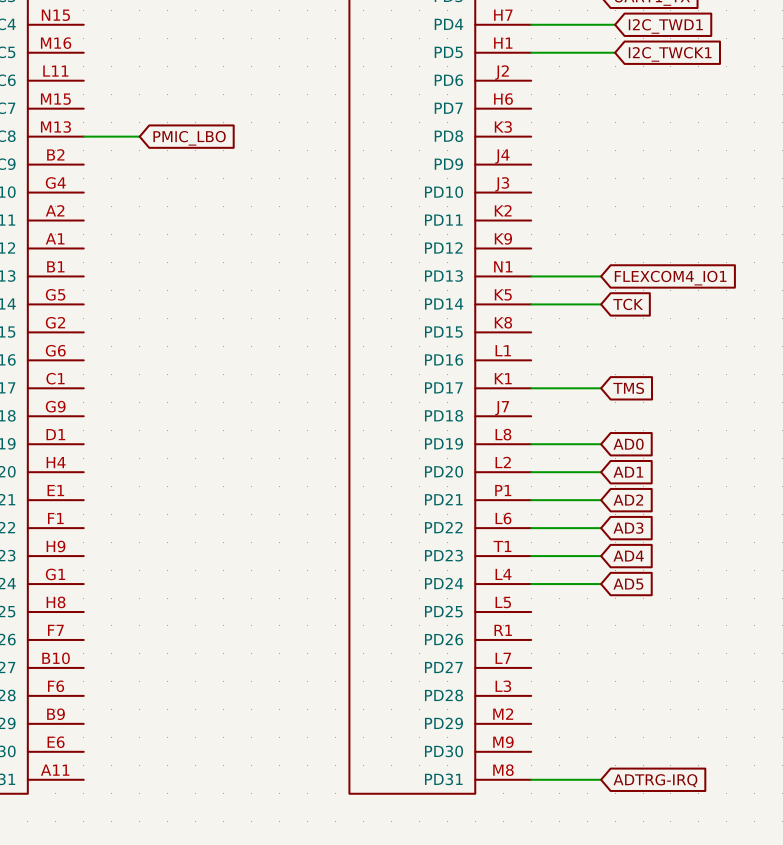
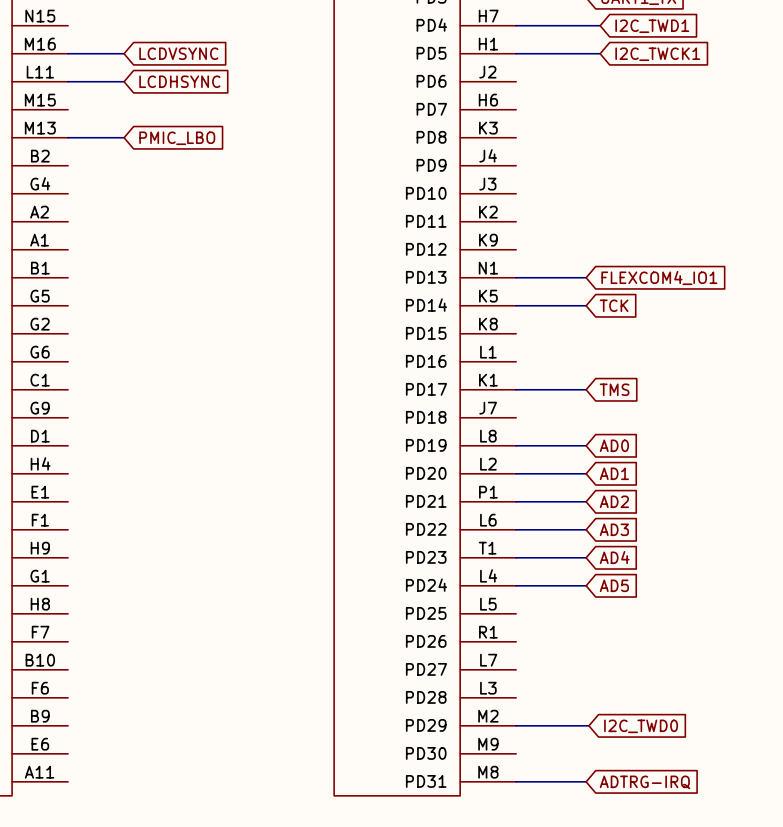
wire: none -> (68, 53) (124, 53)
global label: none -> LCDVSYNC (178, 53)
wire: none -> (68, 81) (124, 81)
global label: none -> LCDHSYNC (179, 81)
wire: none -> (516, 725) (588, 725)
global label: none -> I2C_TWD0 (641, 726)

